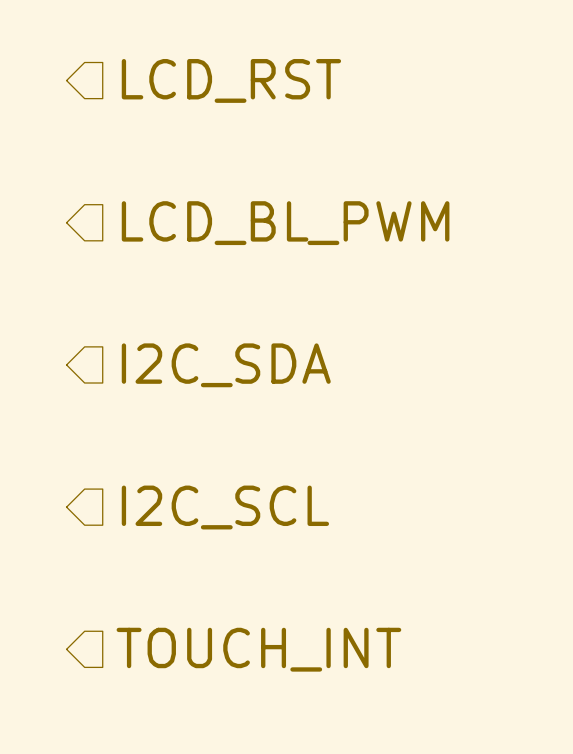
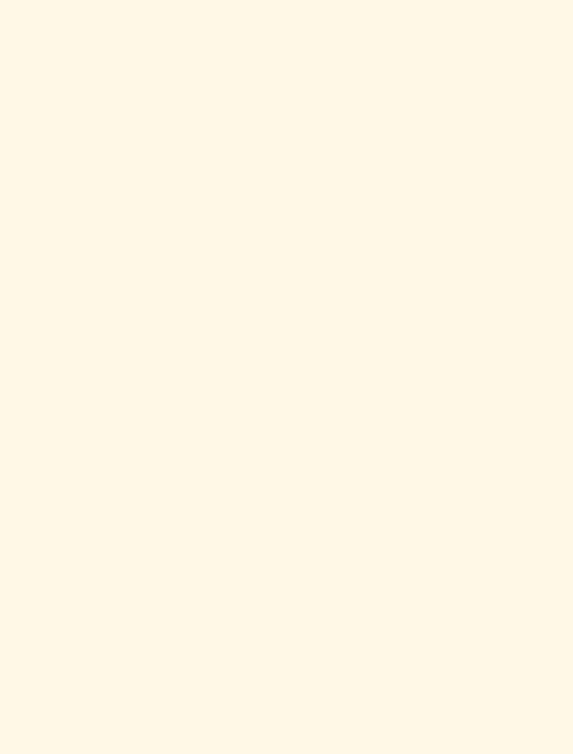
hierarchical label: LCD_RST (231, 80) -> none
hierarchical label: LCD_BL_PWM (285, 223) -> none
hierarchical label: I2C_SDA (226, 365) -> none
hierarchical label: I2C_SCL (225, 507) -> none
hierarchical label: TOUCH_INT (258, 649) -> none

